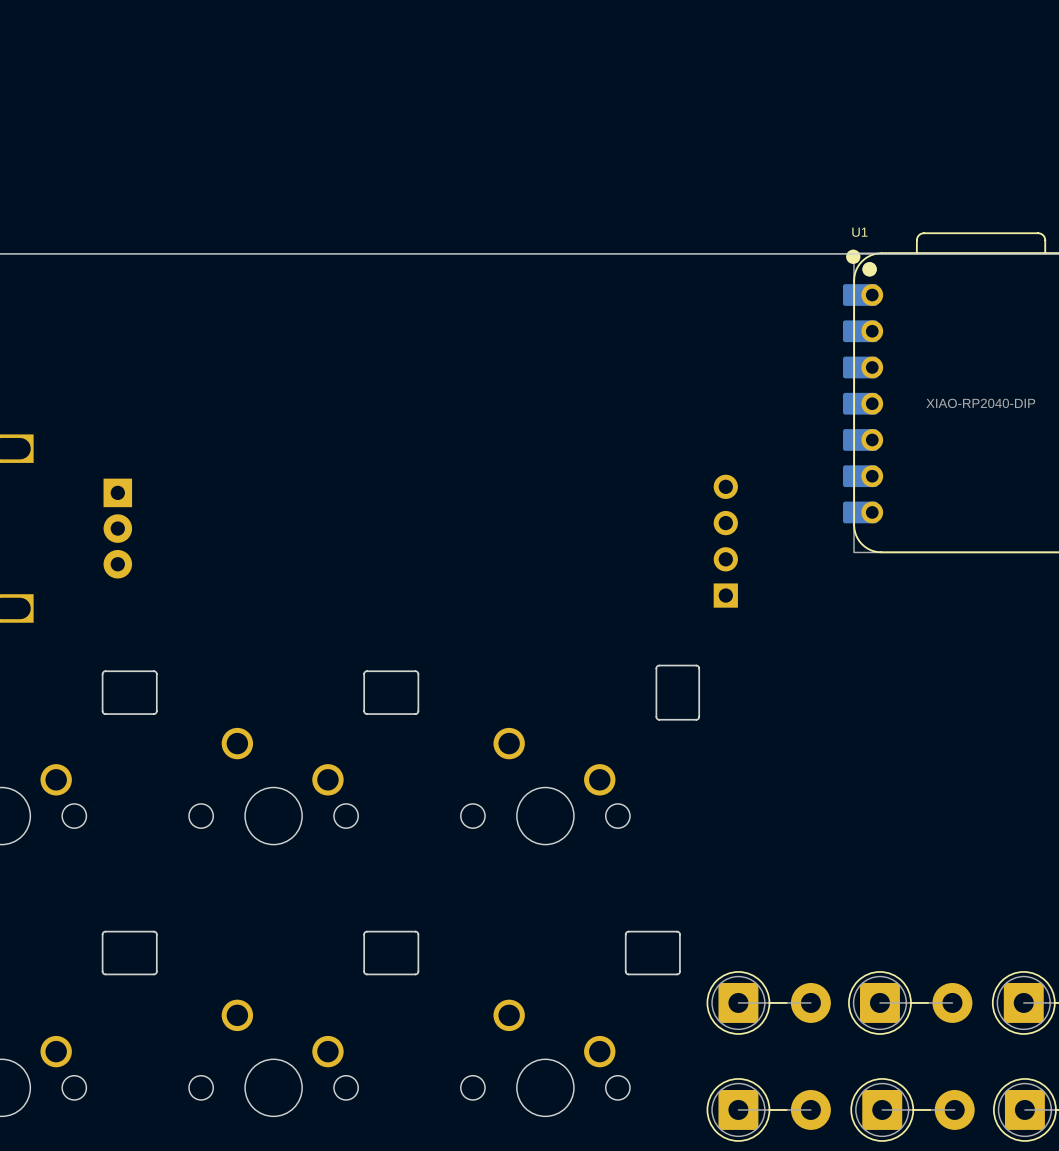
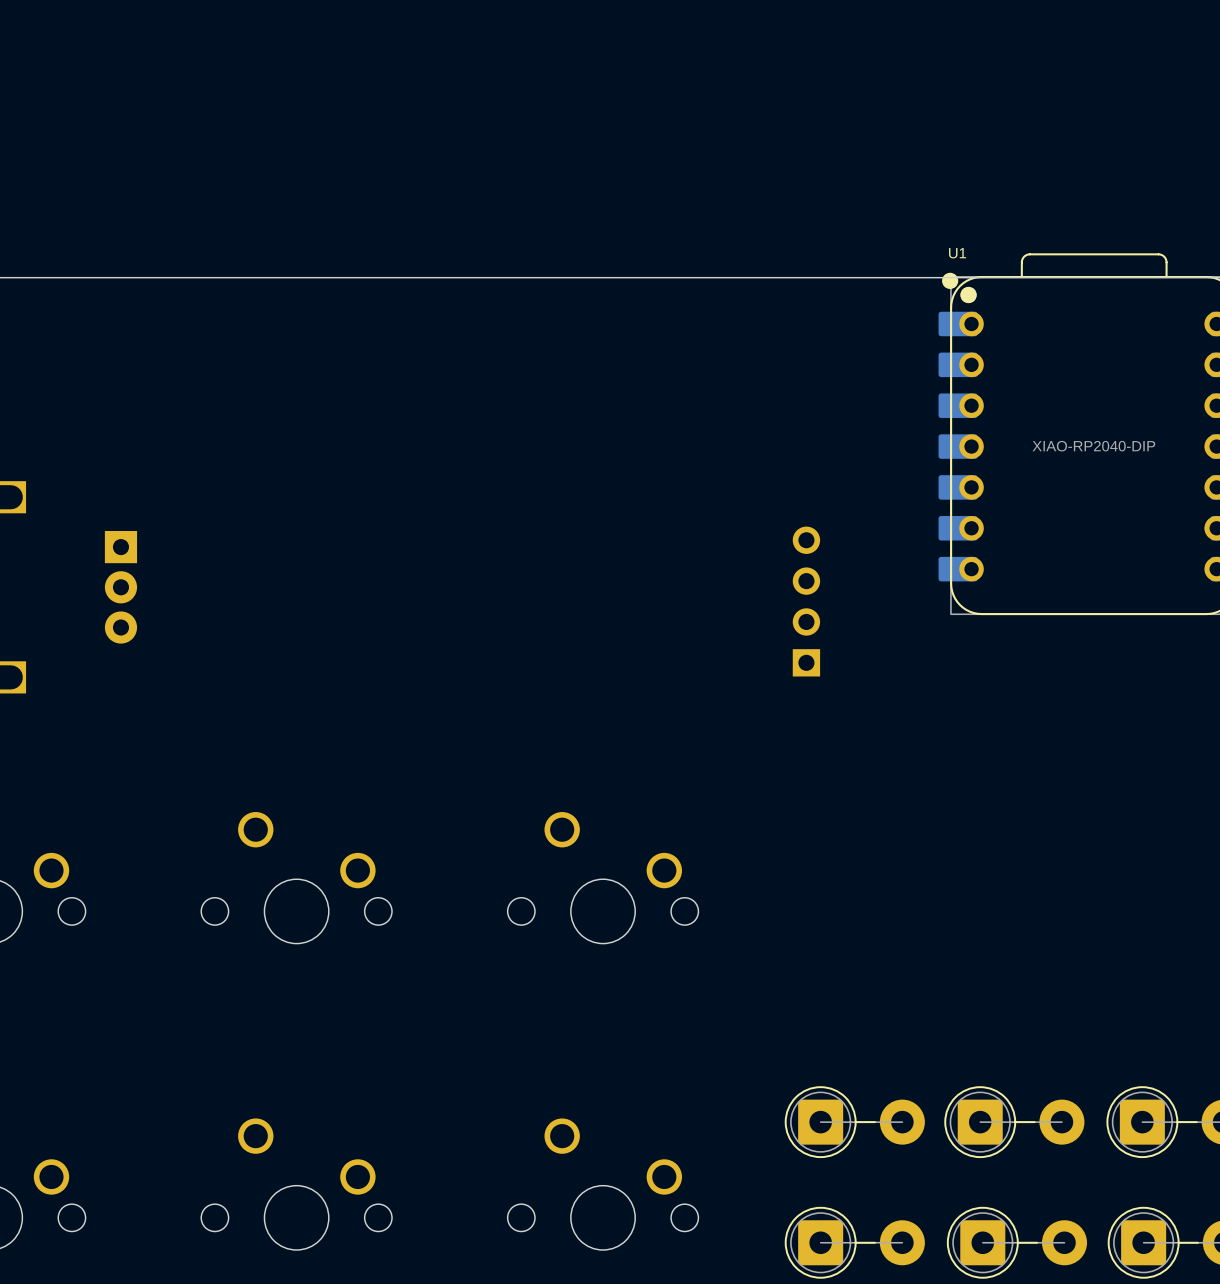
part: (129, 692) -> none
part: (391, 692) -> none
part: (677, 692) -> none
part: (129, 953) -> none
part: (391, 953) -> none
part: (652, 953) -> none

